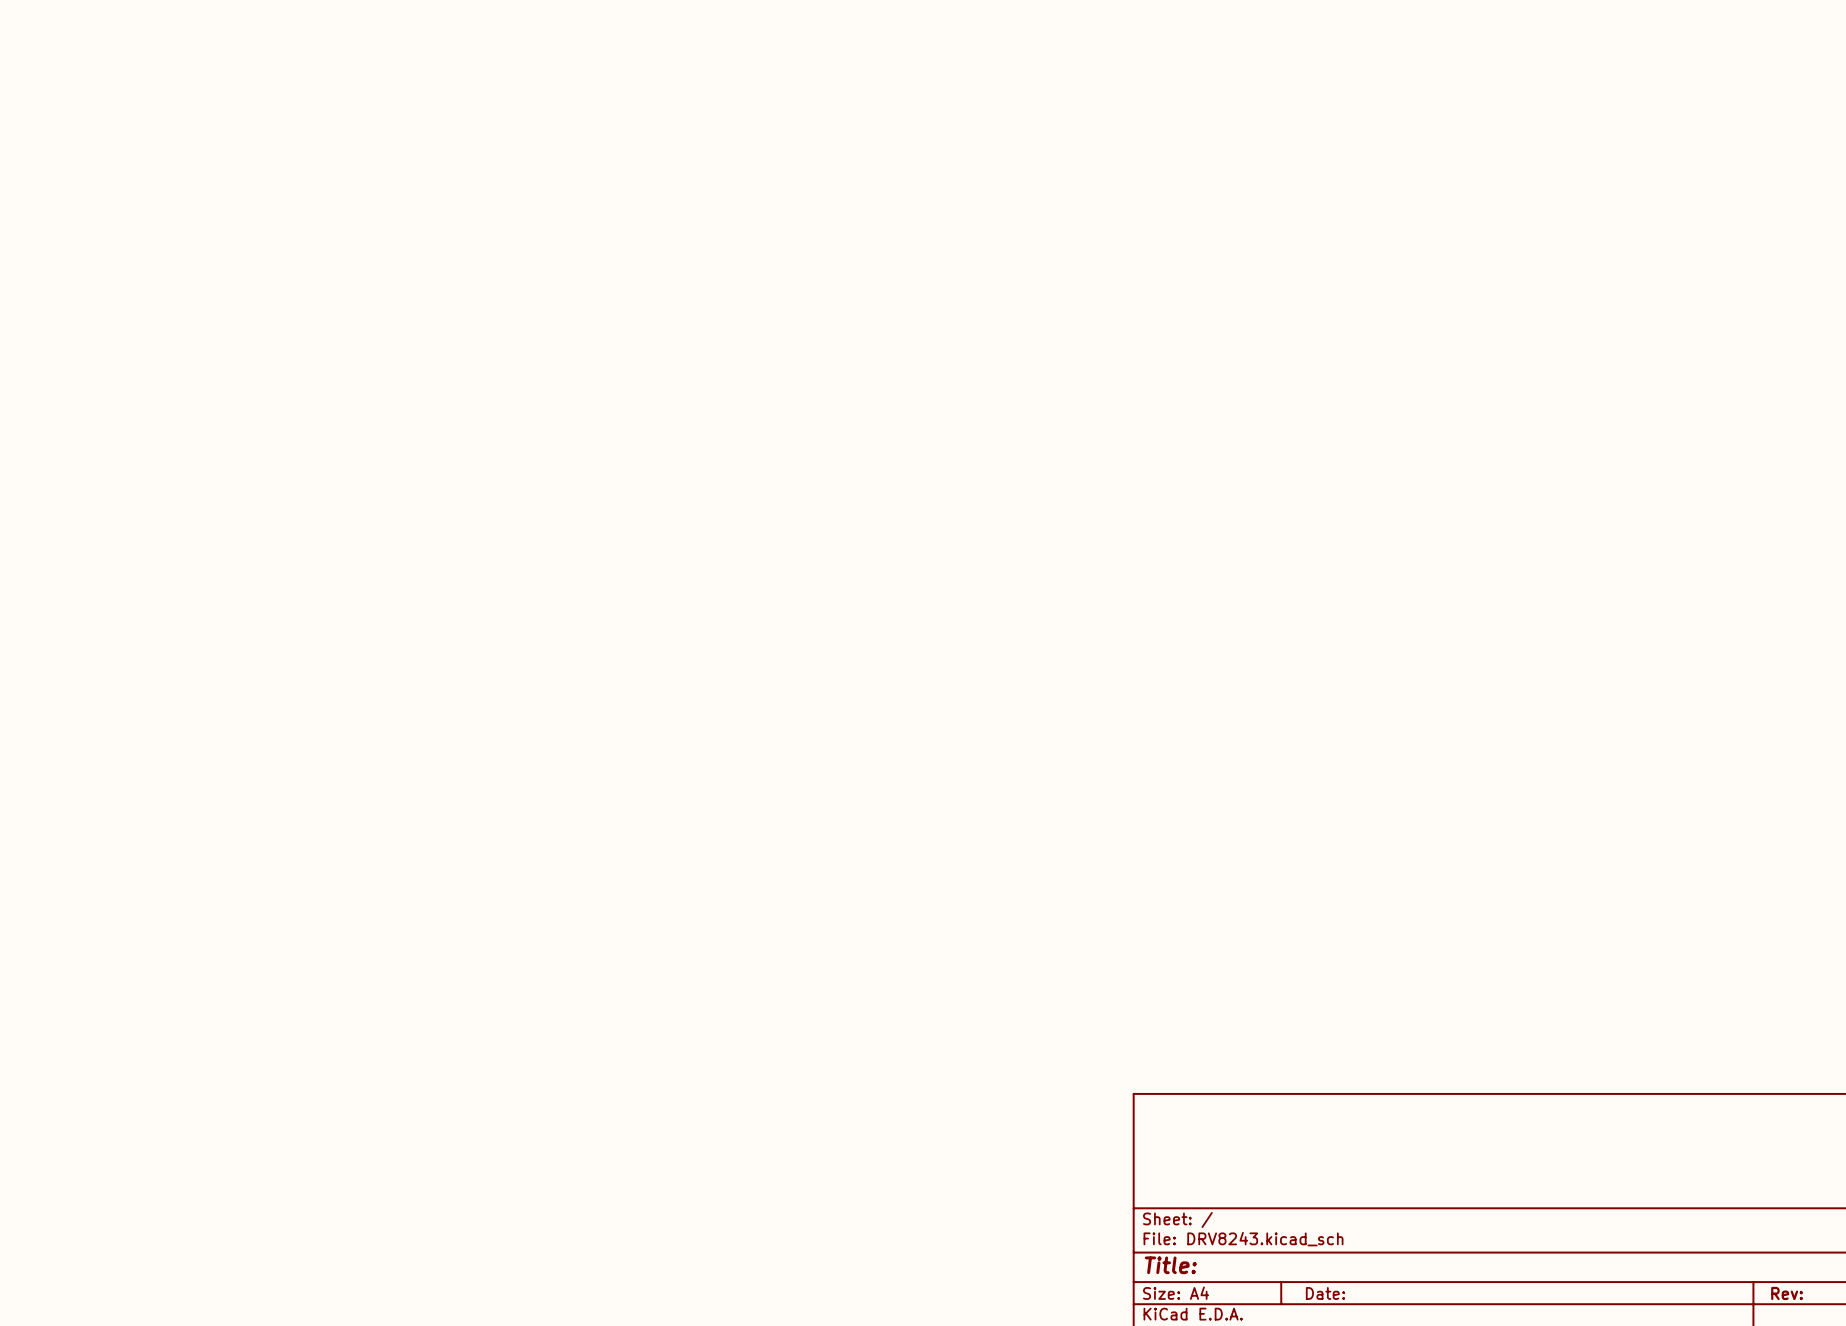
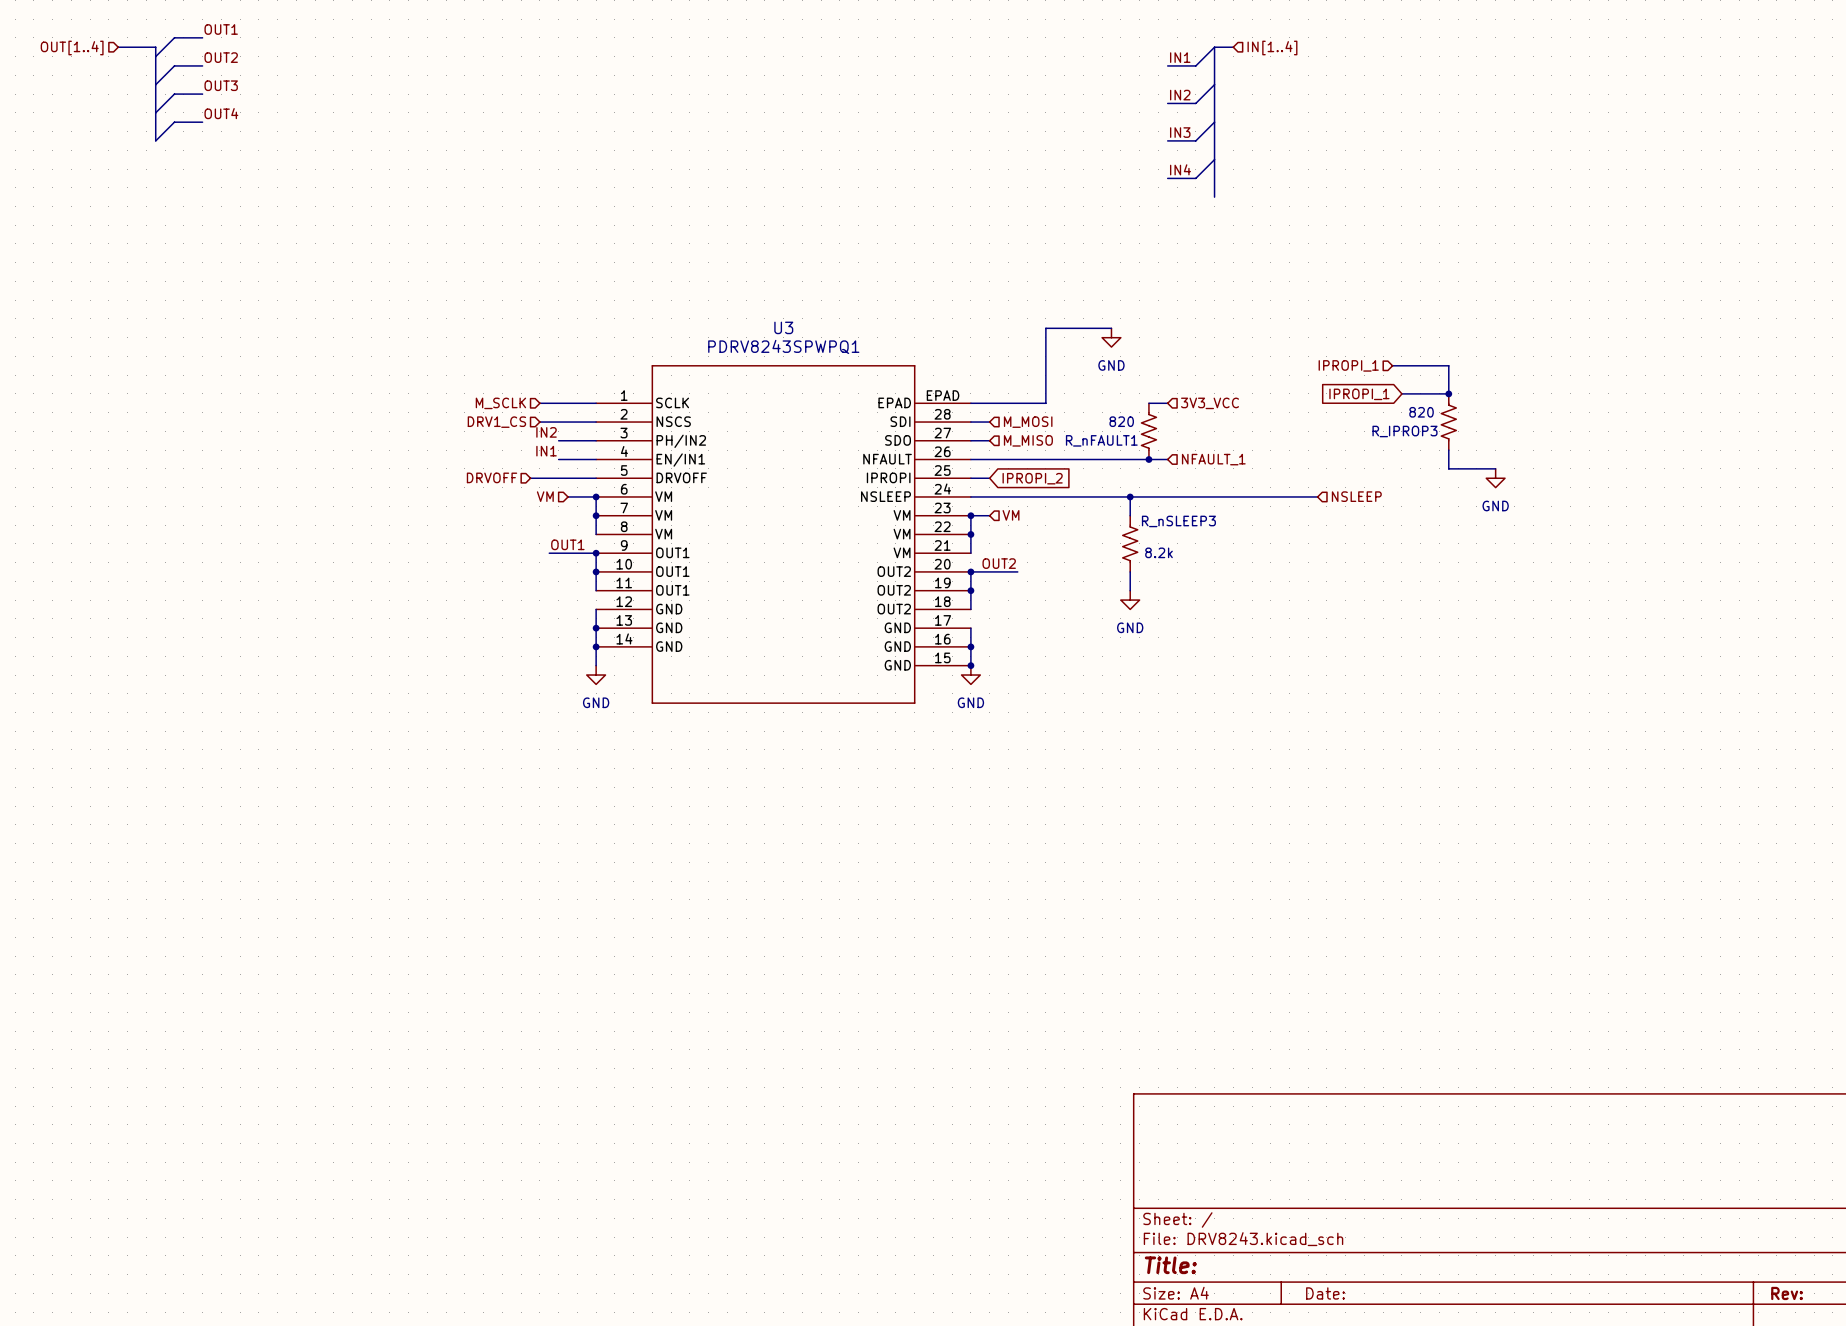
label: none -> OUT1 (221, 29)
wire: none -> (202, 37) (174, 37) (155, 56)
hierarchical label: none -> OUT[1..4] (72, 47)
bus: none -> (118, 47) (155, 47) (155, 140)
wire: none -> (1214, 47) (1195, 65) (1167, 65)
bus: none -> (1233, 47) (1214, 47) (1214, 197)
hierarchical label: none -> IN[1..4] (1272, 47)
label: none -> OUT2 (221, 57)
label: none -> IN1 (1180, 57)
wire: none -> (202, 65) (174, 65) (155, 84)
wire: none -> (1214, 84) (1195, 103) (1167, 103)
label: none -> OUT3 (221, 85)
wire: none -> (202, 94) (174, 94) (155, 112)
label: none -> IN2 (1180, 95)
label: none -> OUT4 (221, 113)
wire: none -> (202, 122) (174, 122) (155, 140)
wire: none -> (1214, 122) (1195, 140) (1167, 140)
label: none -> IN3 (1180, 132)
wire: none -> (1214, 159) (1195, 178) (1167, 178)
label: none -> IN4 (1180, 169)
wire: none -> (1111, 328) (1045, 328) (1045, 403) (970, 403)
power symbol: none -> GND (1111, 337)
hierarchical label: none -> IPROPI_1 (1348, 365)
wire: none -> (1392, 365) (1448, 365) (1448, 393) (1401, 393)
junction: none -> (1448, 393)
global label: none -> IPROPI_1 (1359, 394)
hierarchical label: none -> M_SCLK (500, 403)
wire: none -> (539, 403) (596, 403)
wire: none -> (1148, 403) (1167, 403)
hierarchical label: none -> 3V3_VCC (1210, 403)
hierarchical label: none -> DRV1_CS (496, 422)
wire: none -> (539, 422) (596, 422)
wire: none -> (970, 422) (989, 422)
hierarchical label: none -> M_MOSI (1028, 422)
R_IPROP3: none -> 820 (1448, 422)
R_nFAULT1: none -> 820 (1148, 431)
label: none -> IN2 (546, 432)
wire: none -> (558, 440) (596, 440)
wire: none -> (970, 440) (989, 440)
hierarchical label: none -> M_MISO (1028, 440)
wire: none -> (1448, 450) (1448, 468) (1495, 468)
label: none -> IN1 (546, 451)
wire: none -> (558, 459) (596, 459)
wire: none -> (970, 459) (1167, 459)
junction: none -> (1148, 459)
hierarchical label: none -> NFAULT_1 (1213, 459)
hierarchical label: none -> DRVOFF (492, 477)
wire: none -> (530, 478) (596, 478)
wire: none -> (970, 478) (989, 478)
global label: none -> IPROPI_2 (1032, 478)
power symbol: none -> GND (1495, 478)
hierarchical label: none -> VM (545, 496)
wire: none -> (568, 496) (596, 496) (596, 534)
junction: none -> (596, 496)
wire: none -> (970, 496) (1317, 496)
wire: none -> (1130, 496) (1130, 515)
junction: none -> (1130, 496)
hierarchical label: none -> NSLEEP (1356, 496)
junction: none -> (596, 515)
junction: none -> (970, 515)
wire: none -> (989, 515) (970, 515) (970, 553)
hierarchical label: none -> VM (1011, 515)
U3: none -> PDRV8243SPWPQ1 (783, 534)
junction: none -> (970, 534)
R_nSLEEP3: none -> 8.2k (1130, 543)
label: none -> OUT1 (567, 544)
wire: none -> (549, 553) (596, 553) (596, 590)
junction: none -> (596, 553)
label: none -> OUT2 (999, 563)
junction: none -> (596, 571)
junction: none -> (970, 571)
wire: none -> (1017, 571) (970, 571) (970, 609)
wire: none -> (1130, 571) (1130, 590)
junction: none -> (970, 590)
power symbol: none -> GND (1130, 600)
wire: none -> (596, 609) (596, 665)
junction: none -> (596, 628)
wire: none -> (970, 628) (970, 665)
junction: none -> (596, 646)
junction: none -> (970, 646)
junction: none -> (970, 665)
power symbol: none -> GND (596, 675)
power symbol: none -> GND (970, 675)

